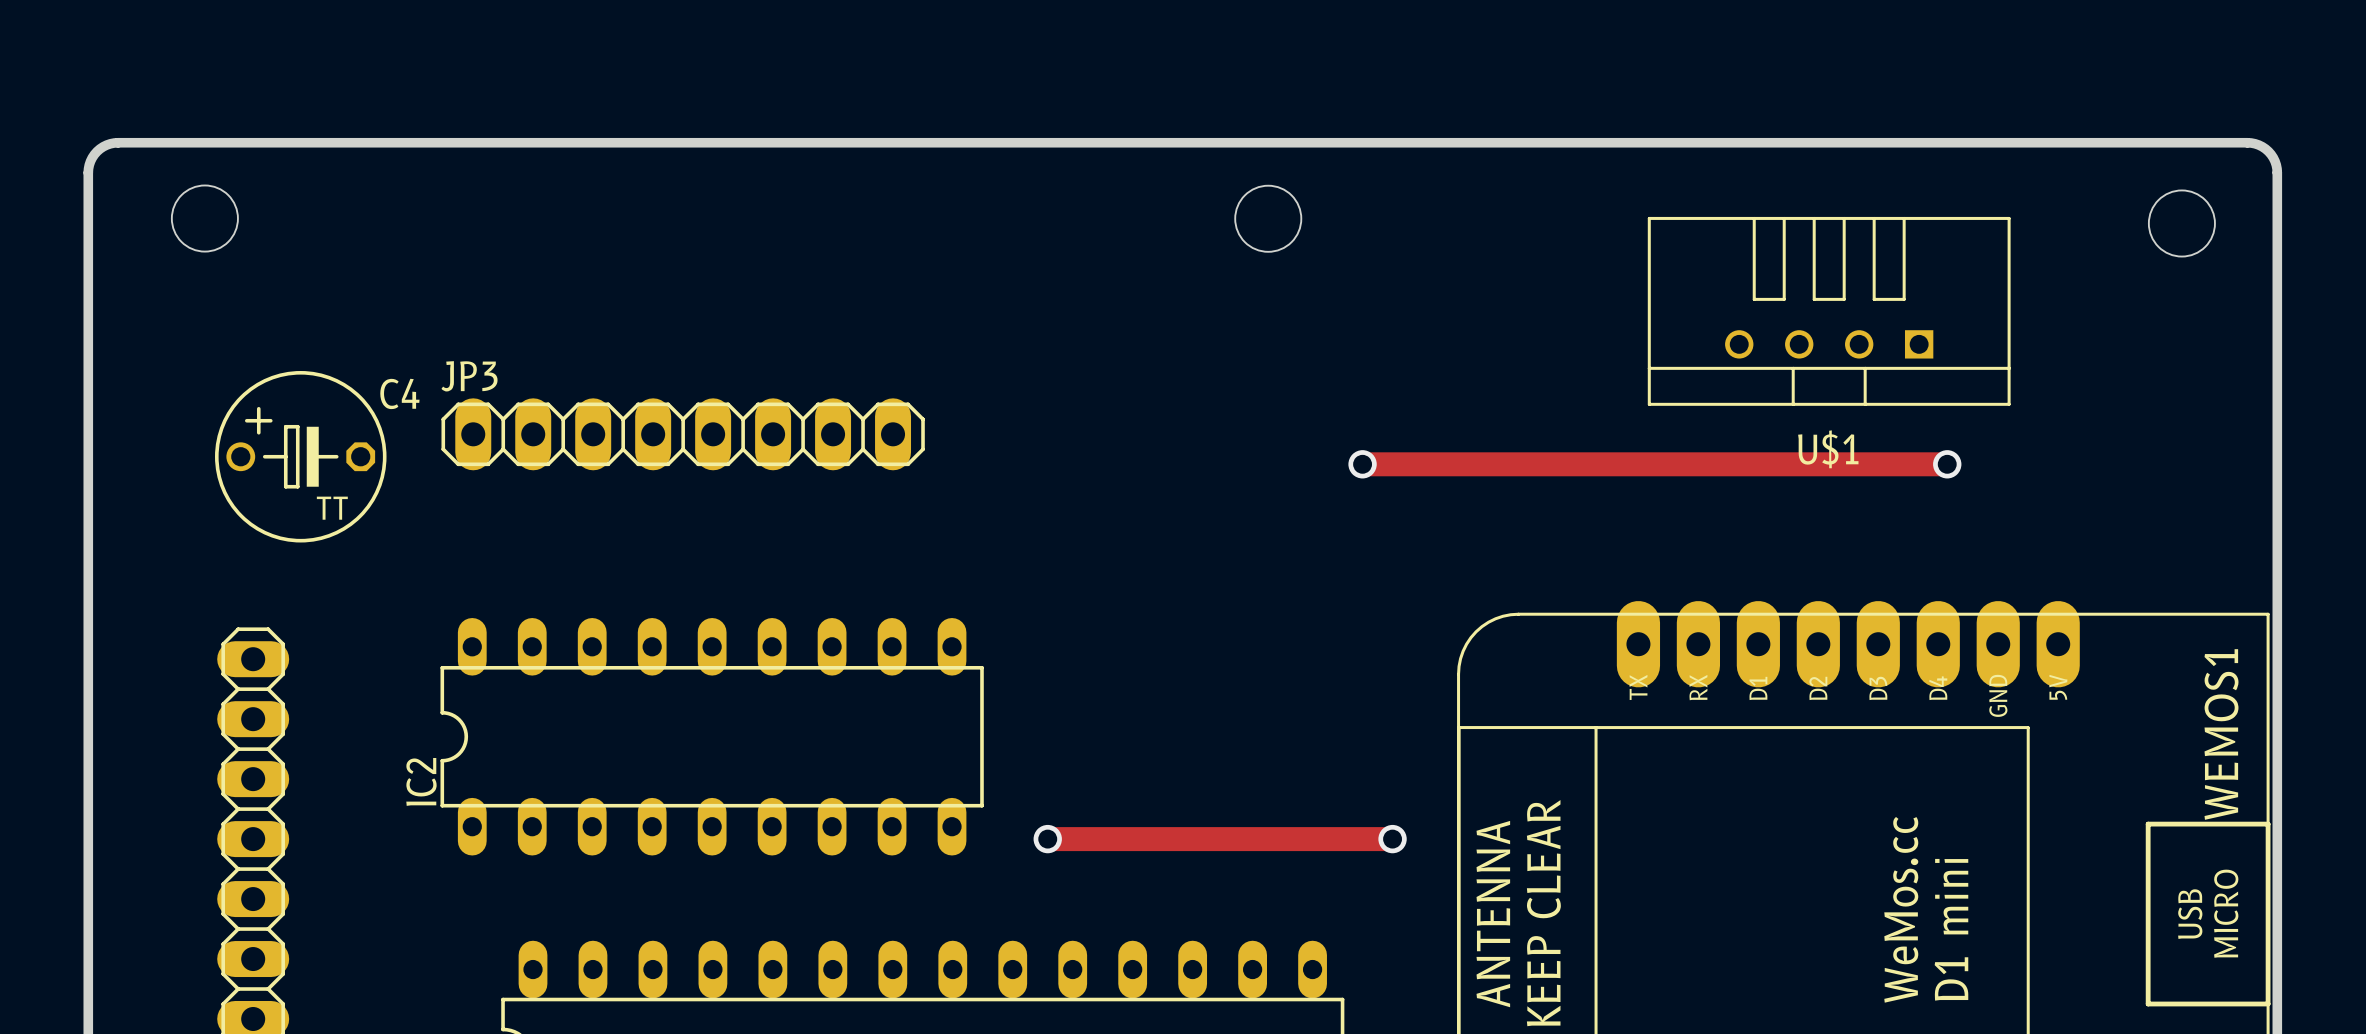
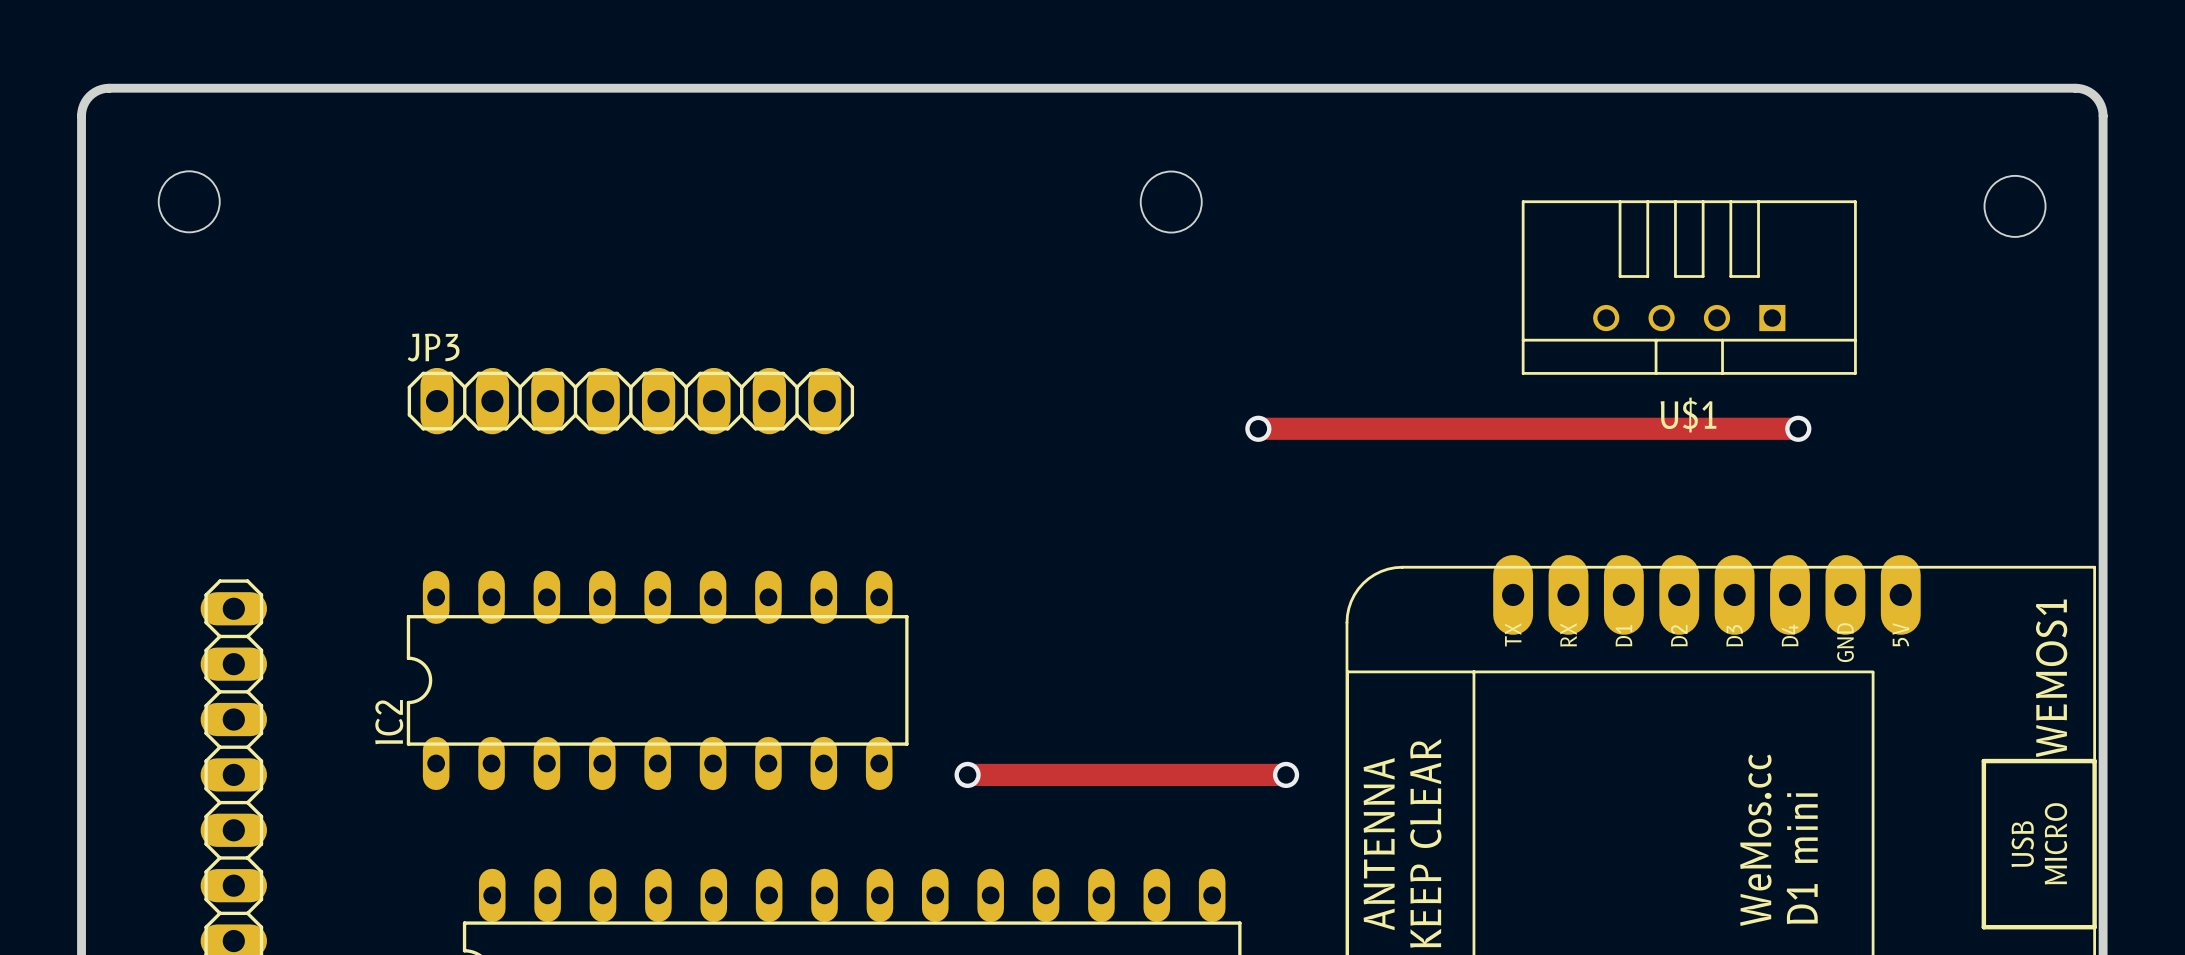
board edge: (88, 172) (90, 161) (97, 151) (106, 145) (118, 142) (2247, 142) (2258, 145) (2268, 151) (2275, 161) (2277, 172) -> (81, 159) (81, 115) (83, 105) (95, 91) (109, 88) (2075, 88) (2089, 91) (2101, 105) (2103, 115) (2103, 159)
C4: (300, 456) -> none

